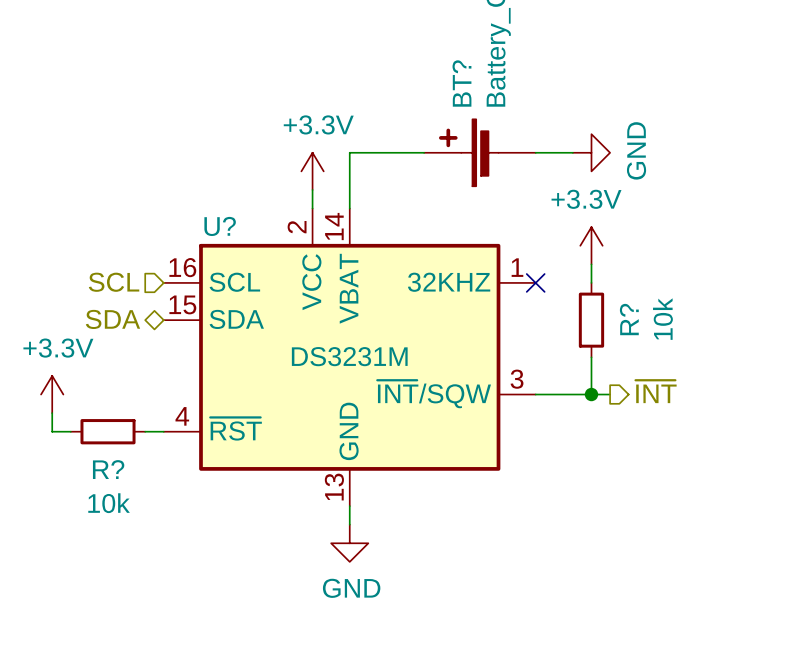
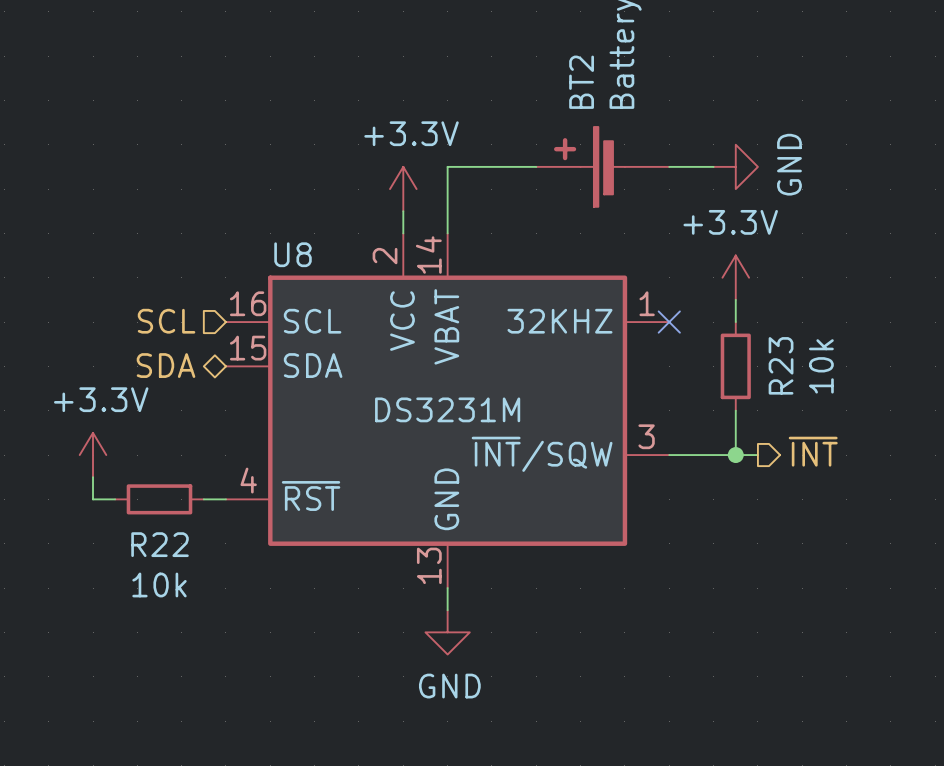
BT? name: BT? (461, 83) -> BT2 (581, 82)
U? name: U? (220, 226) -> U8 (293, 254)
R? name: R? (629, 319) -> R23 (781, 365)
R? name: R? (108, 469) -> R22 (160, 544)

